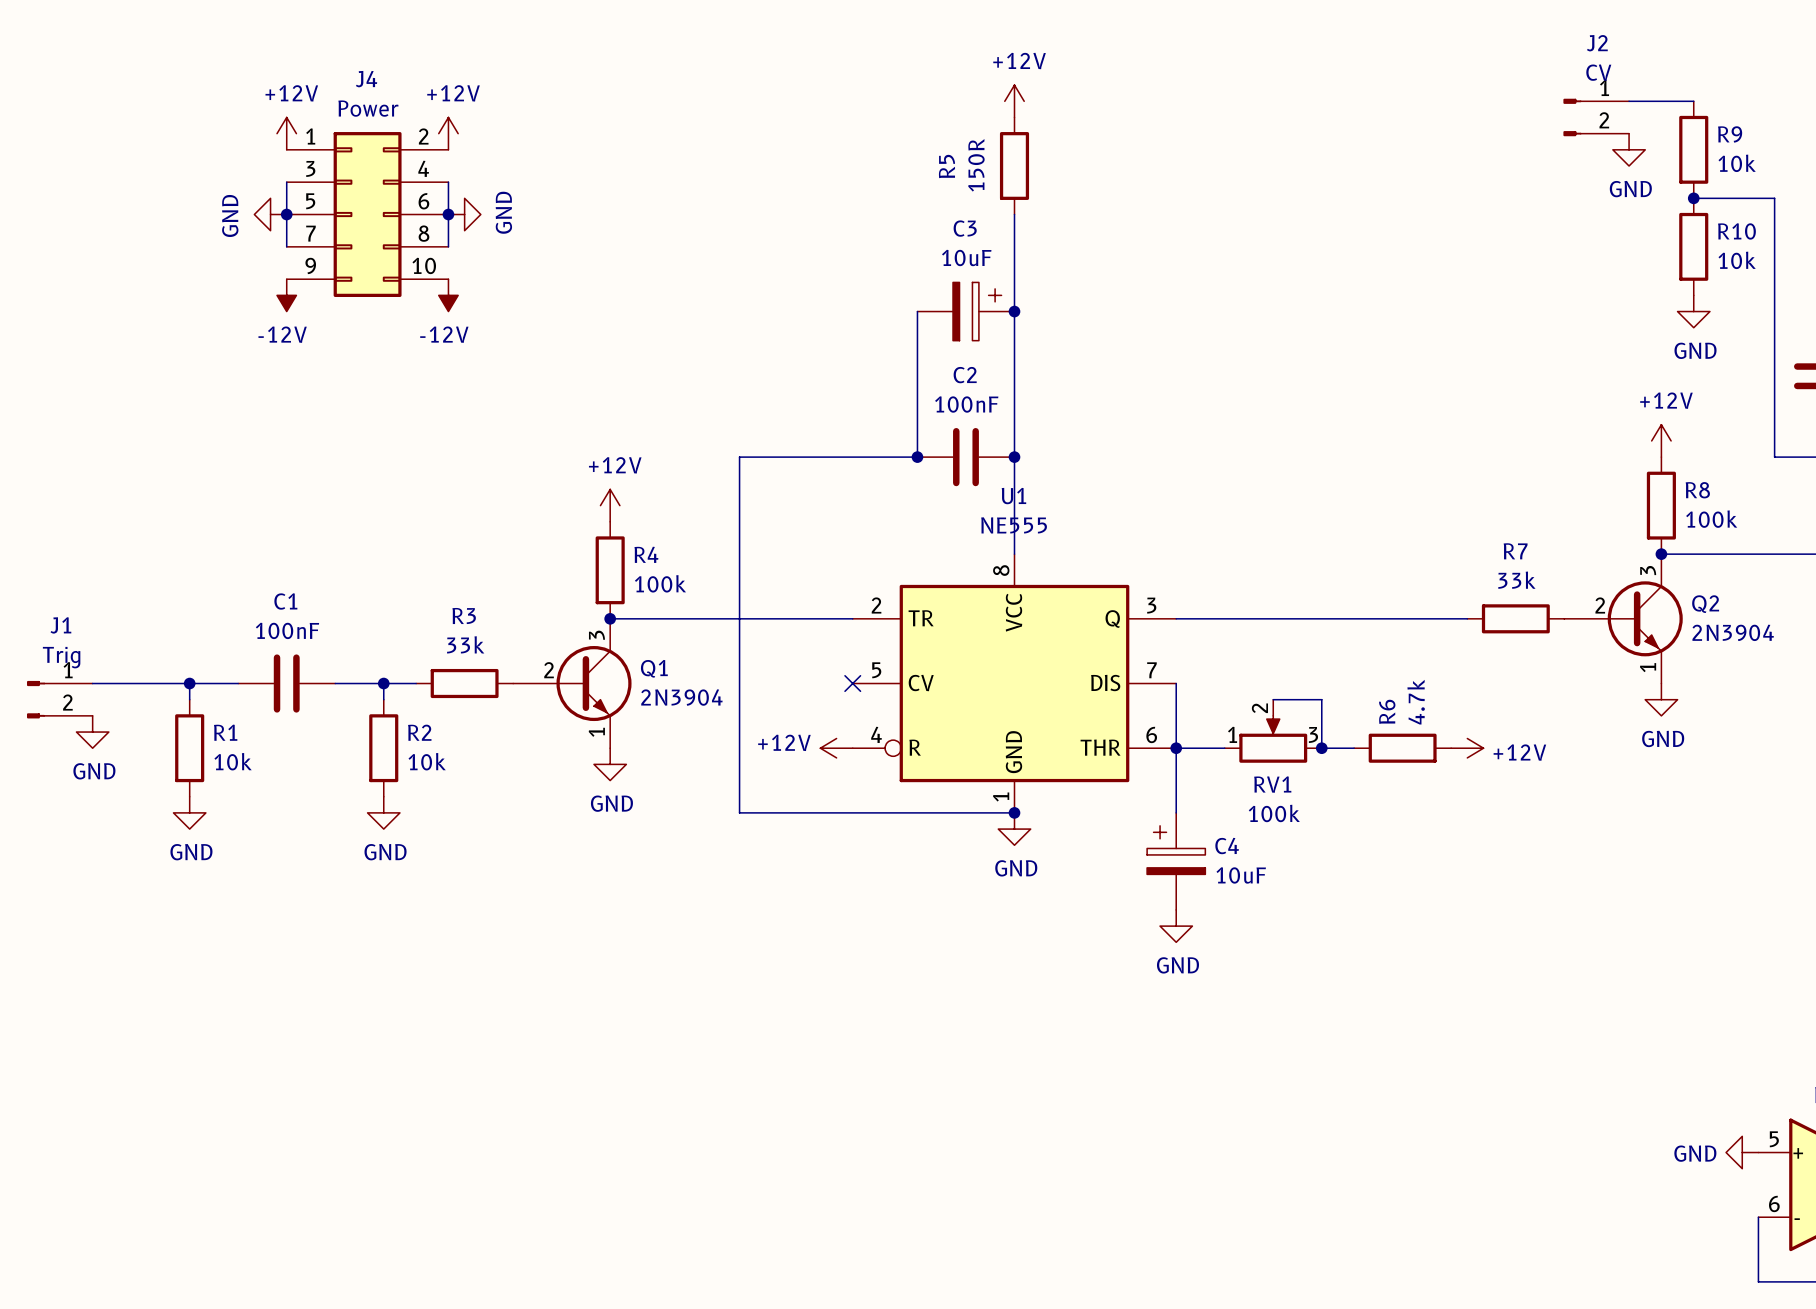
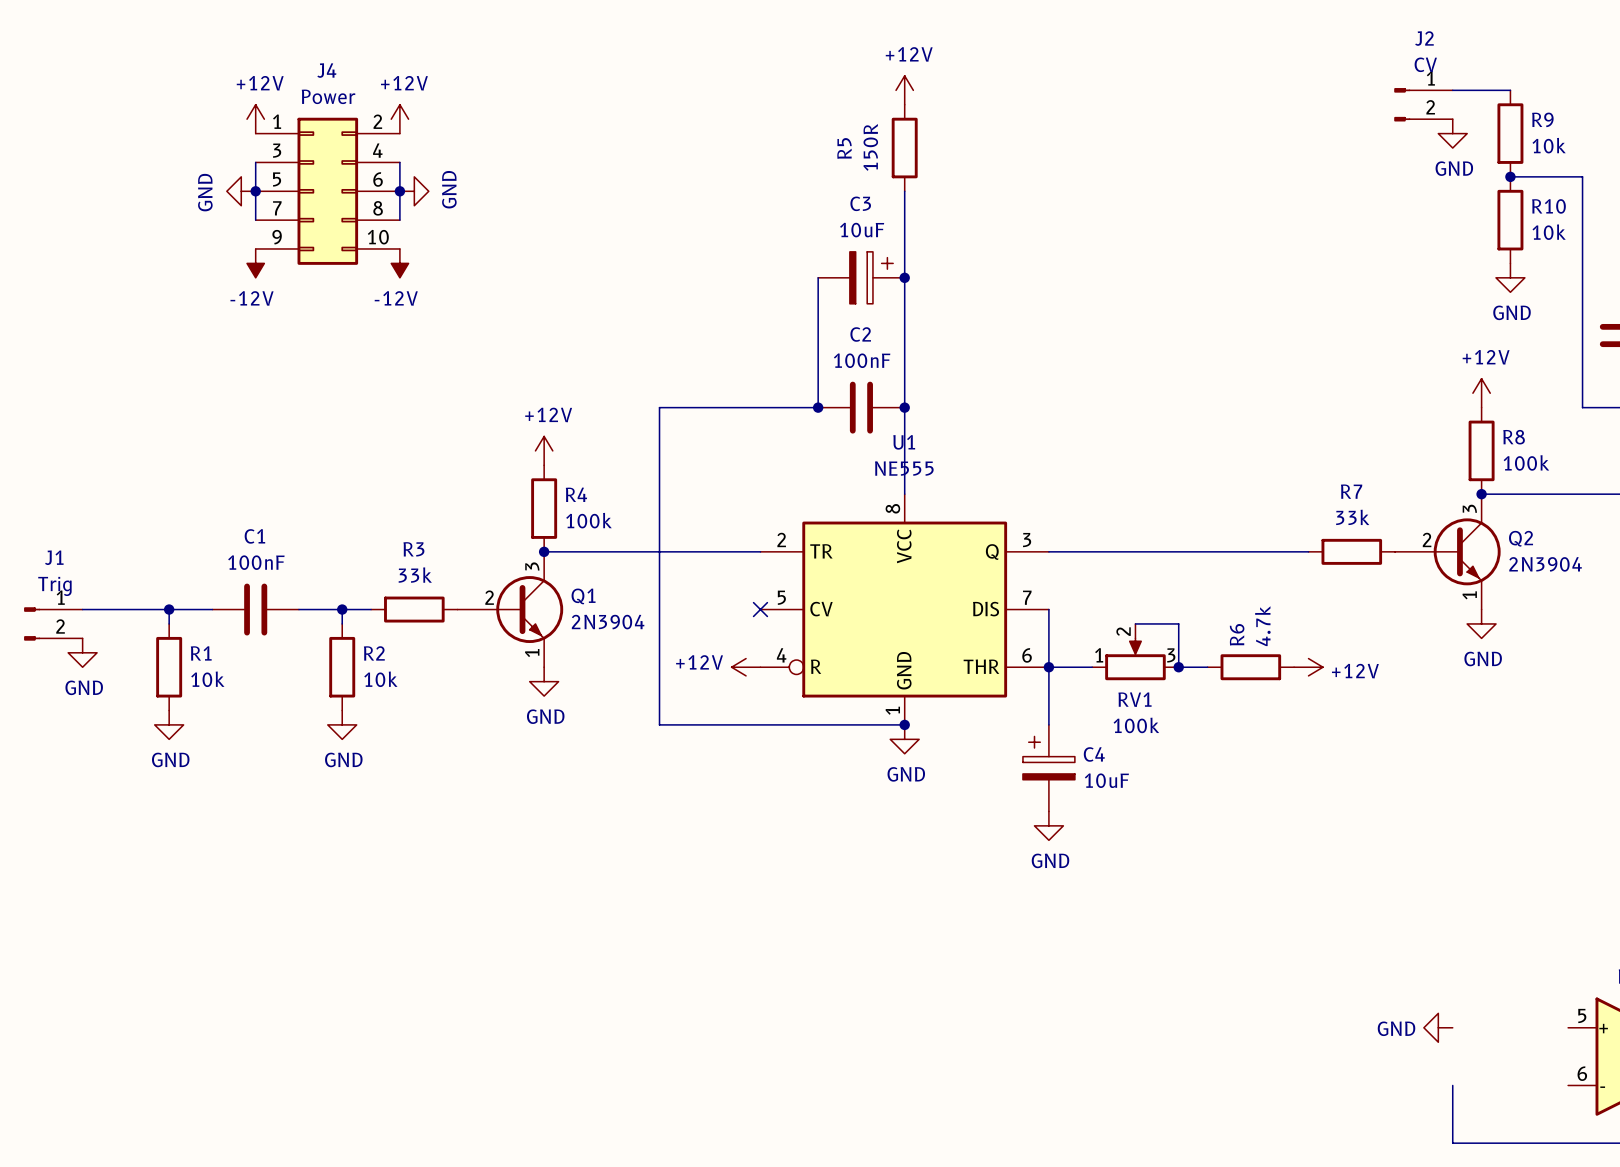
power symbol position: GND (1742, 1152) -> GND (1438, 1027)
wire: (1758, 1217) (1758, 1281) -> (1452, 1085) (1452, 1143) (1568, 1143)

